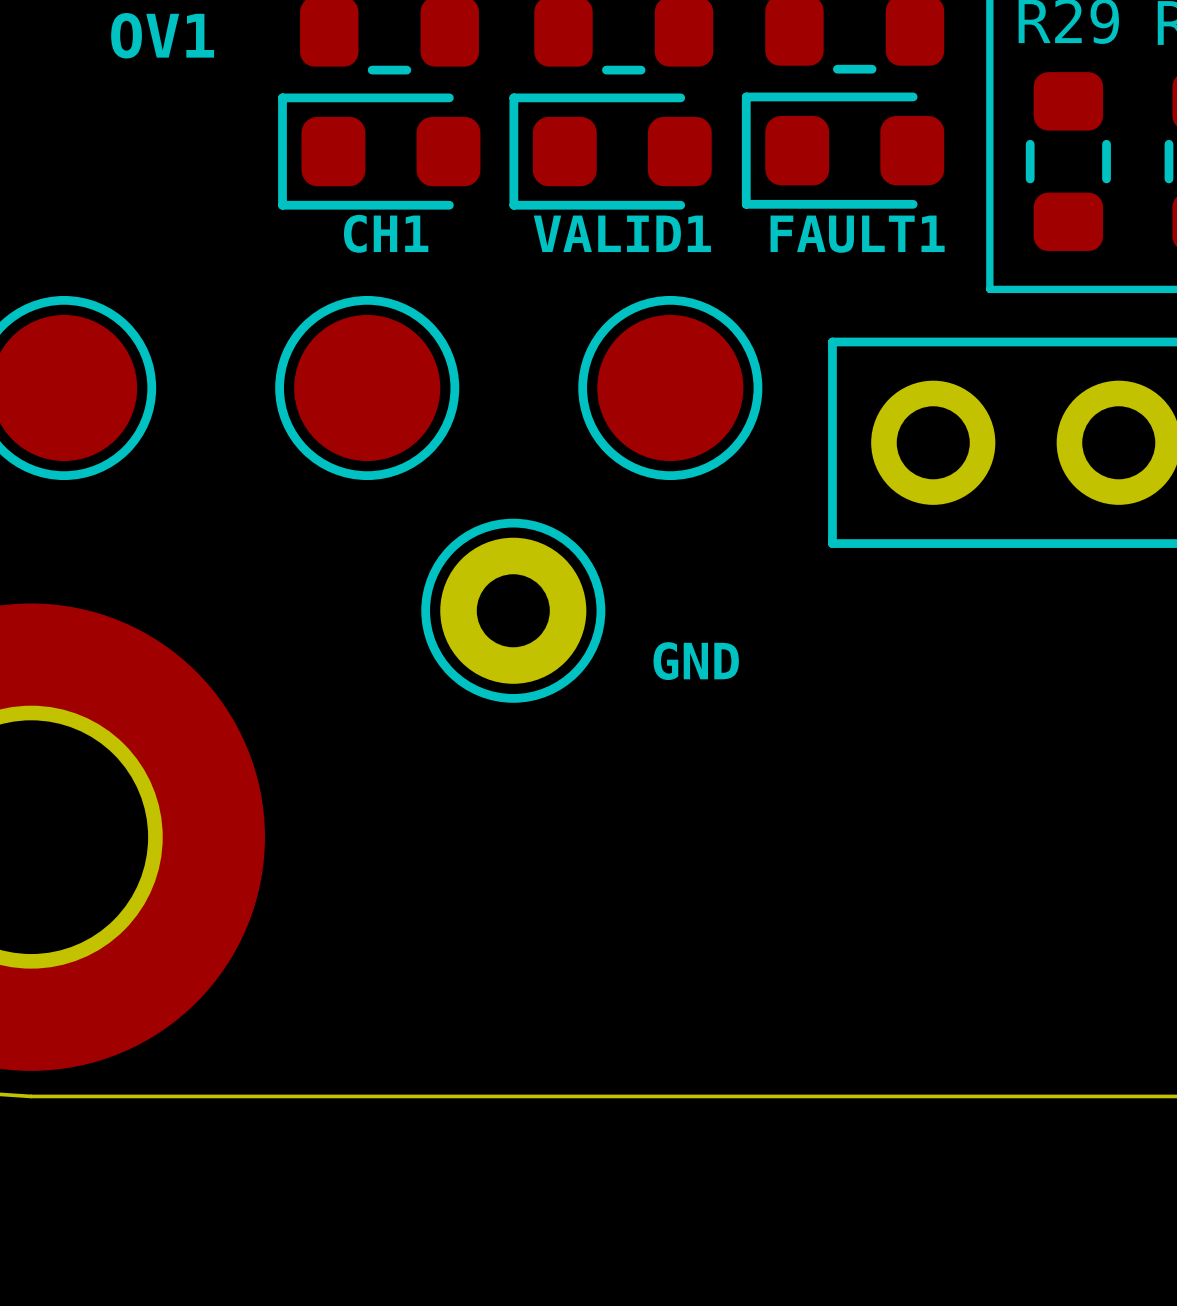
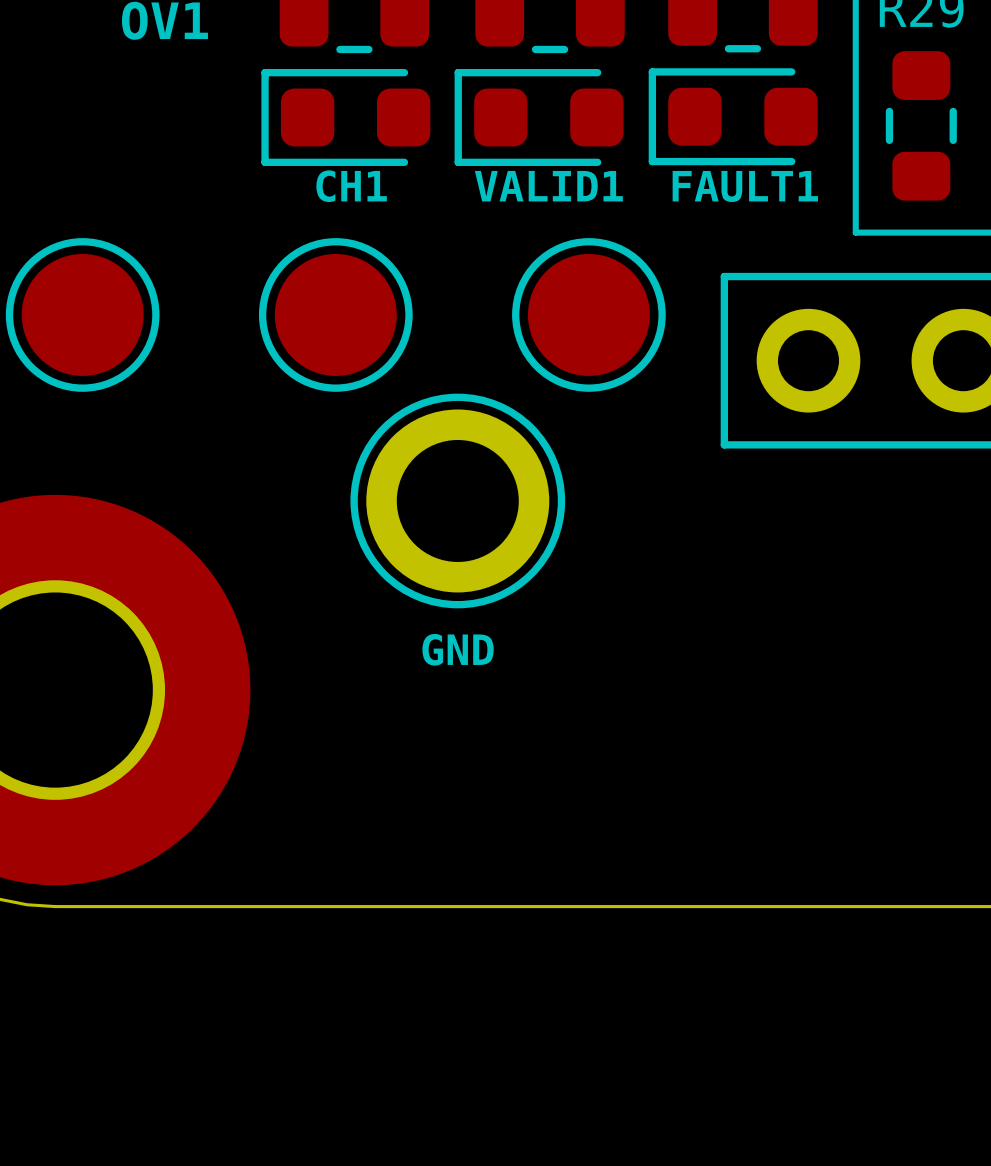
part footprint: [421, 518, 606, 703] -> [350, 393, 566, 609]
text position: GND (696, 661) -> GND (458, 649)

